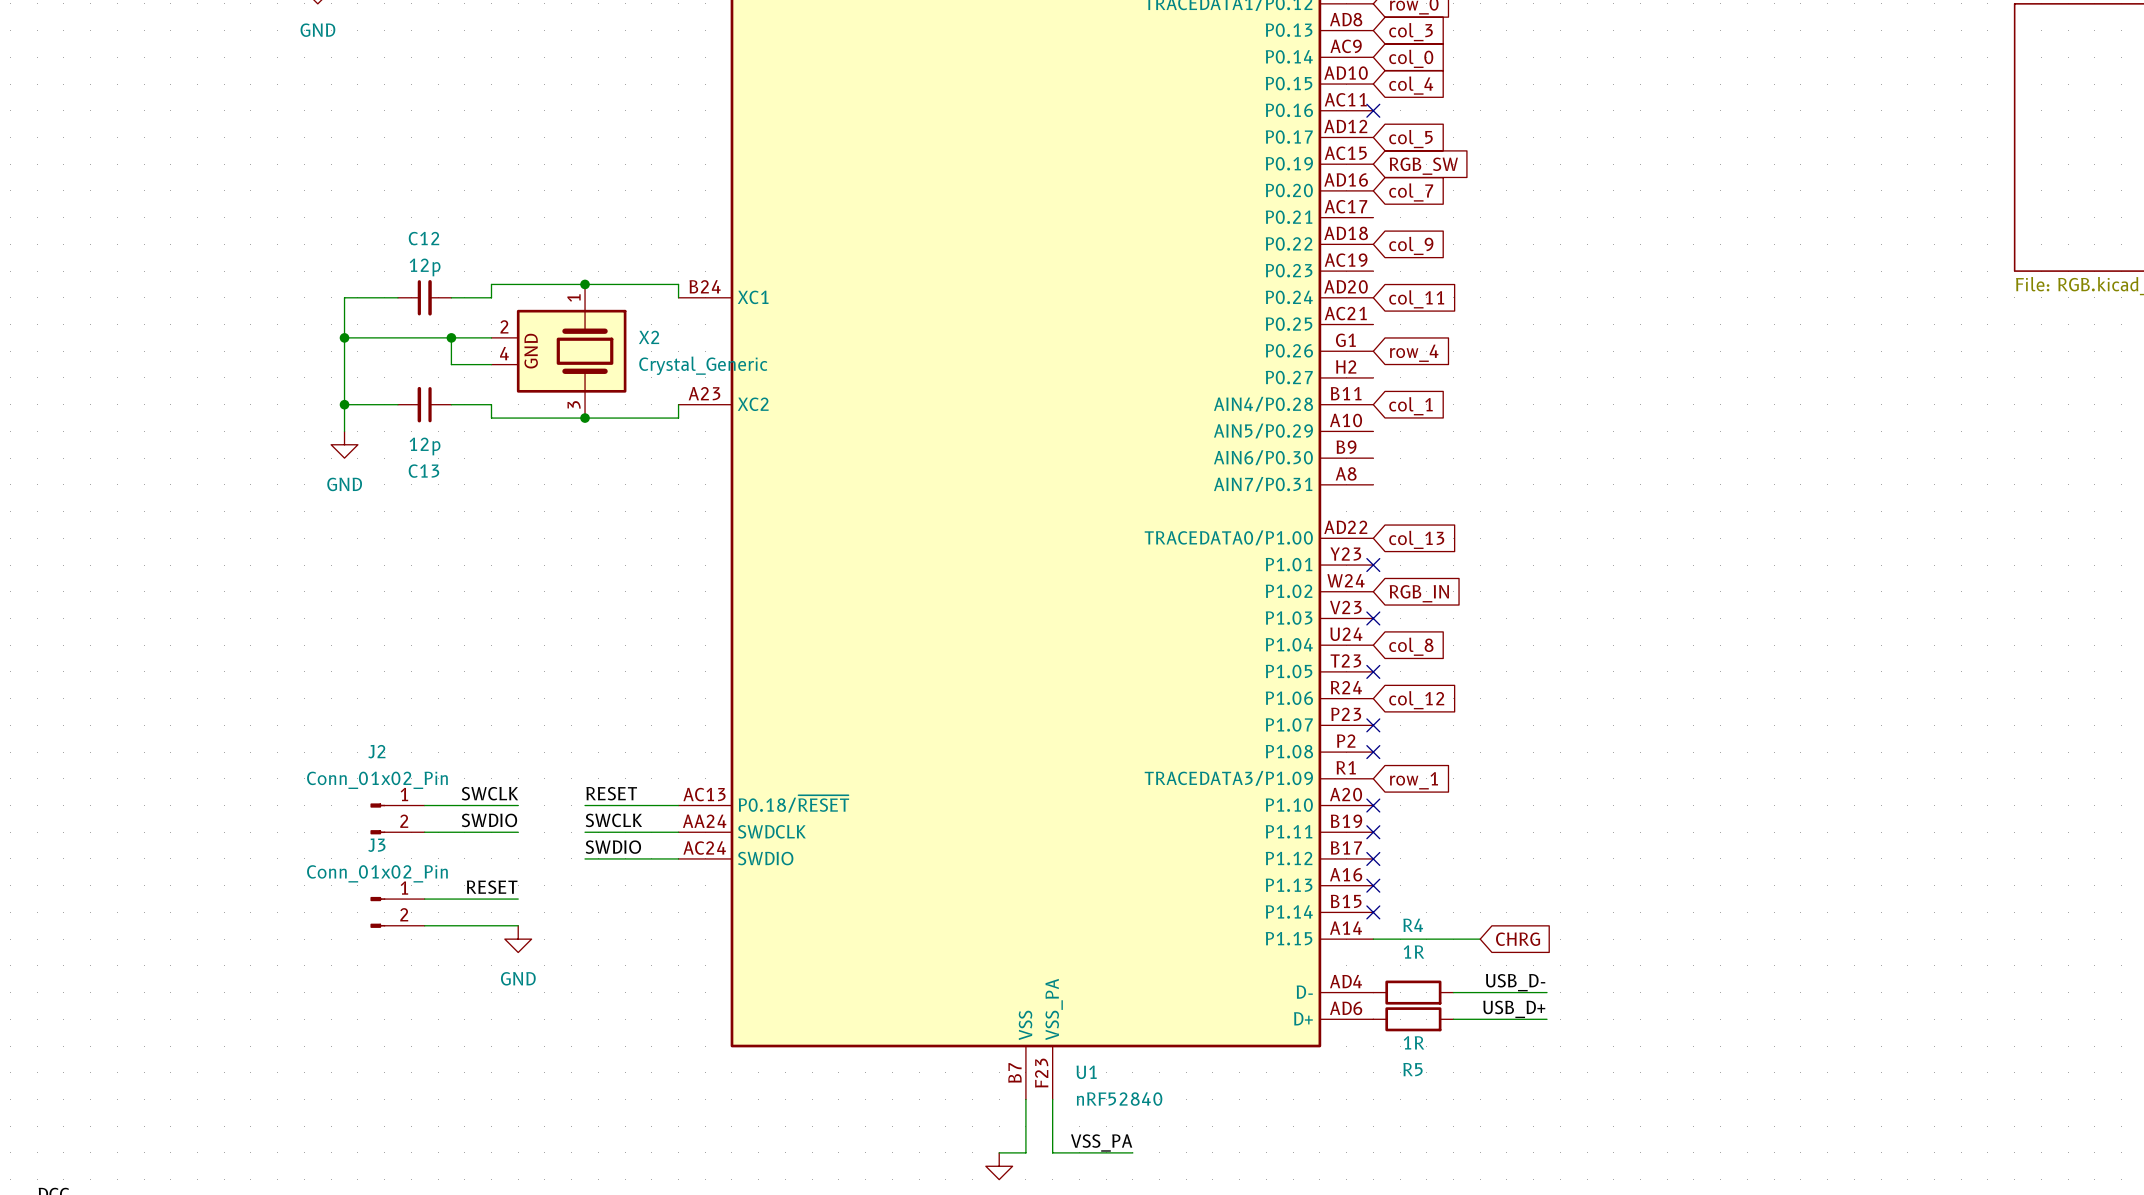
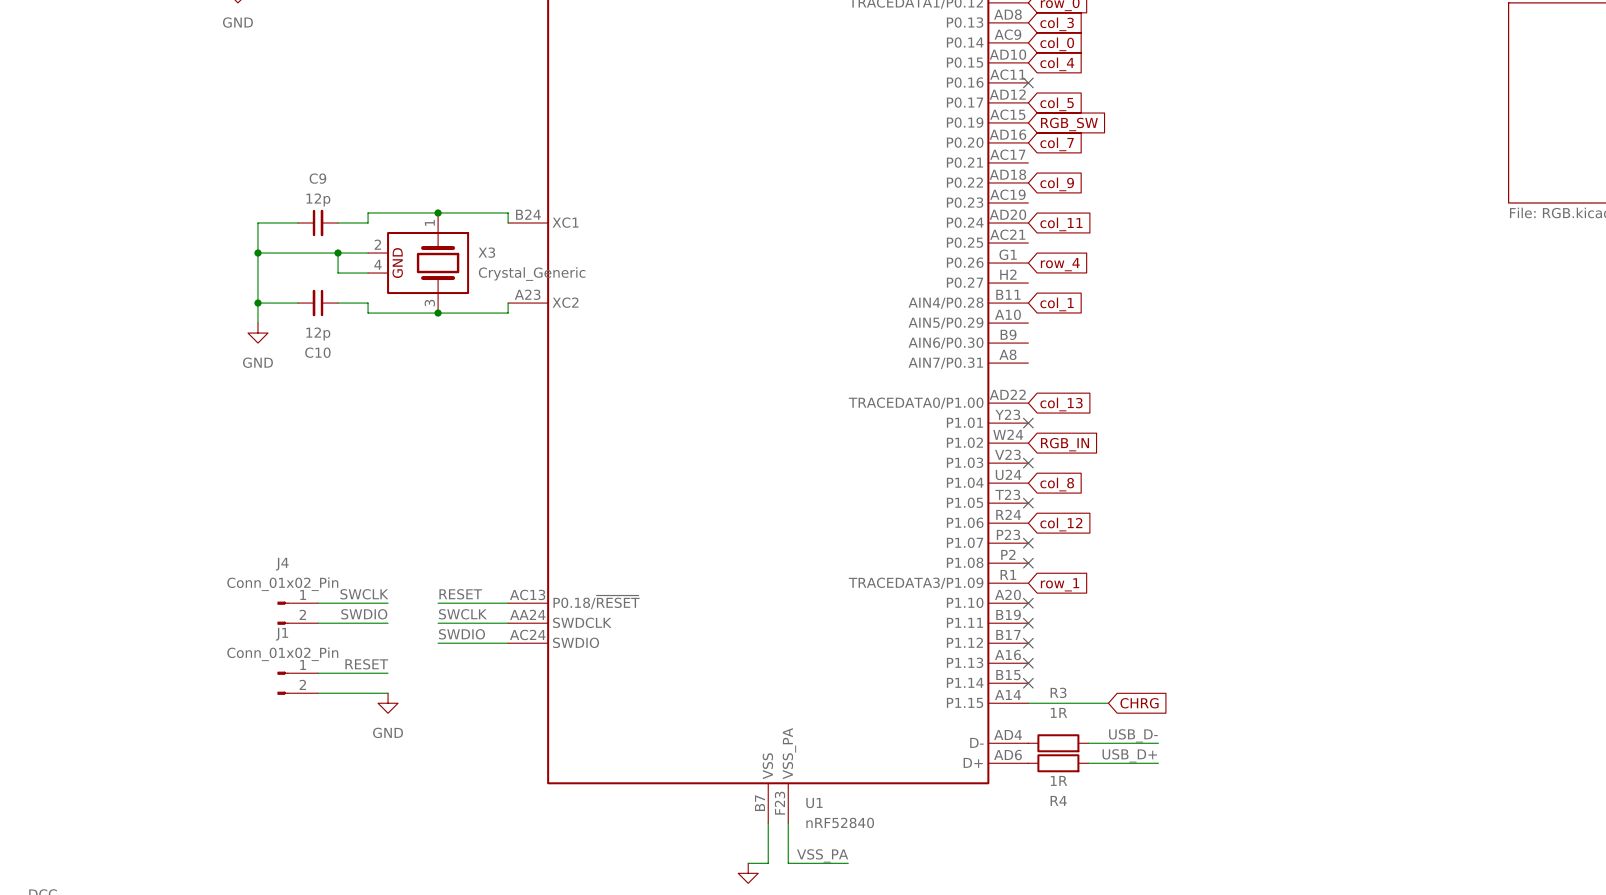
C12 name: C12 (424, 238) -> C9 (317, 178)
X2 name: X2 (649, 337) -> X3 (486, 252)
C13 name: C13 (423, 471) -> C10 (317, 352)
J2 name: J2 (376, 751) -> J4 (282, 564)
J3 name: J3 (376, 845) -> J1 (282, 634)
R4 name: R4 (1413, 925) -> R3 (1058, 692)
R5 name: R5 (1412, 1069) -> R4 (1058, 800)

